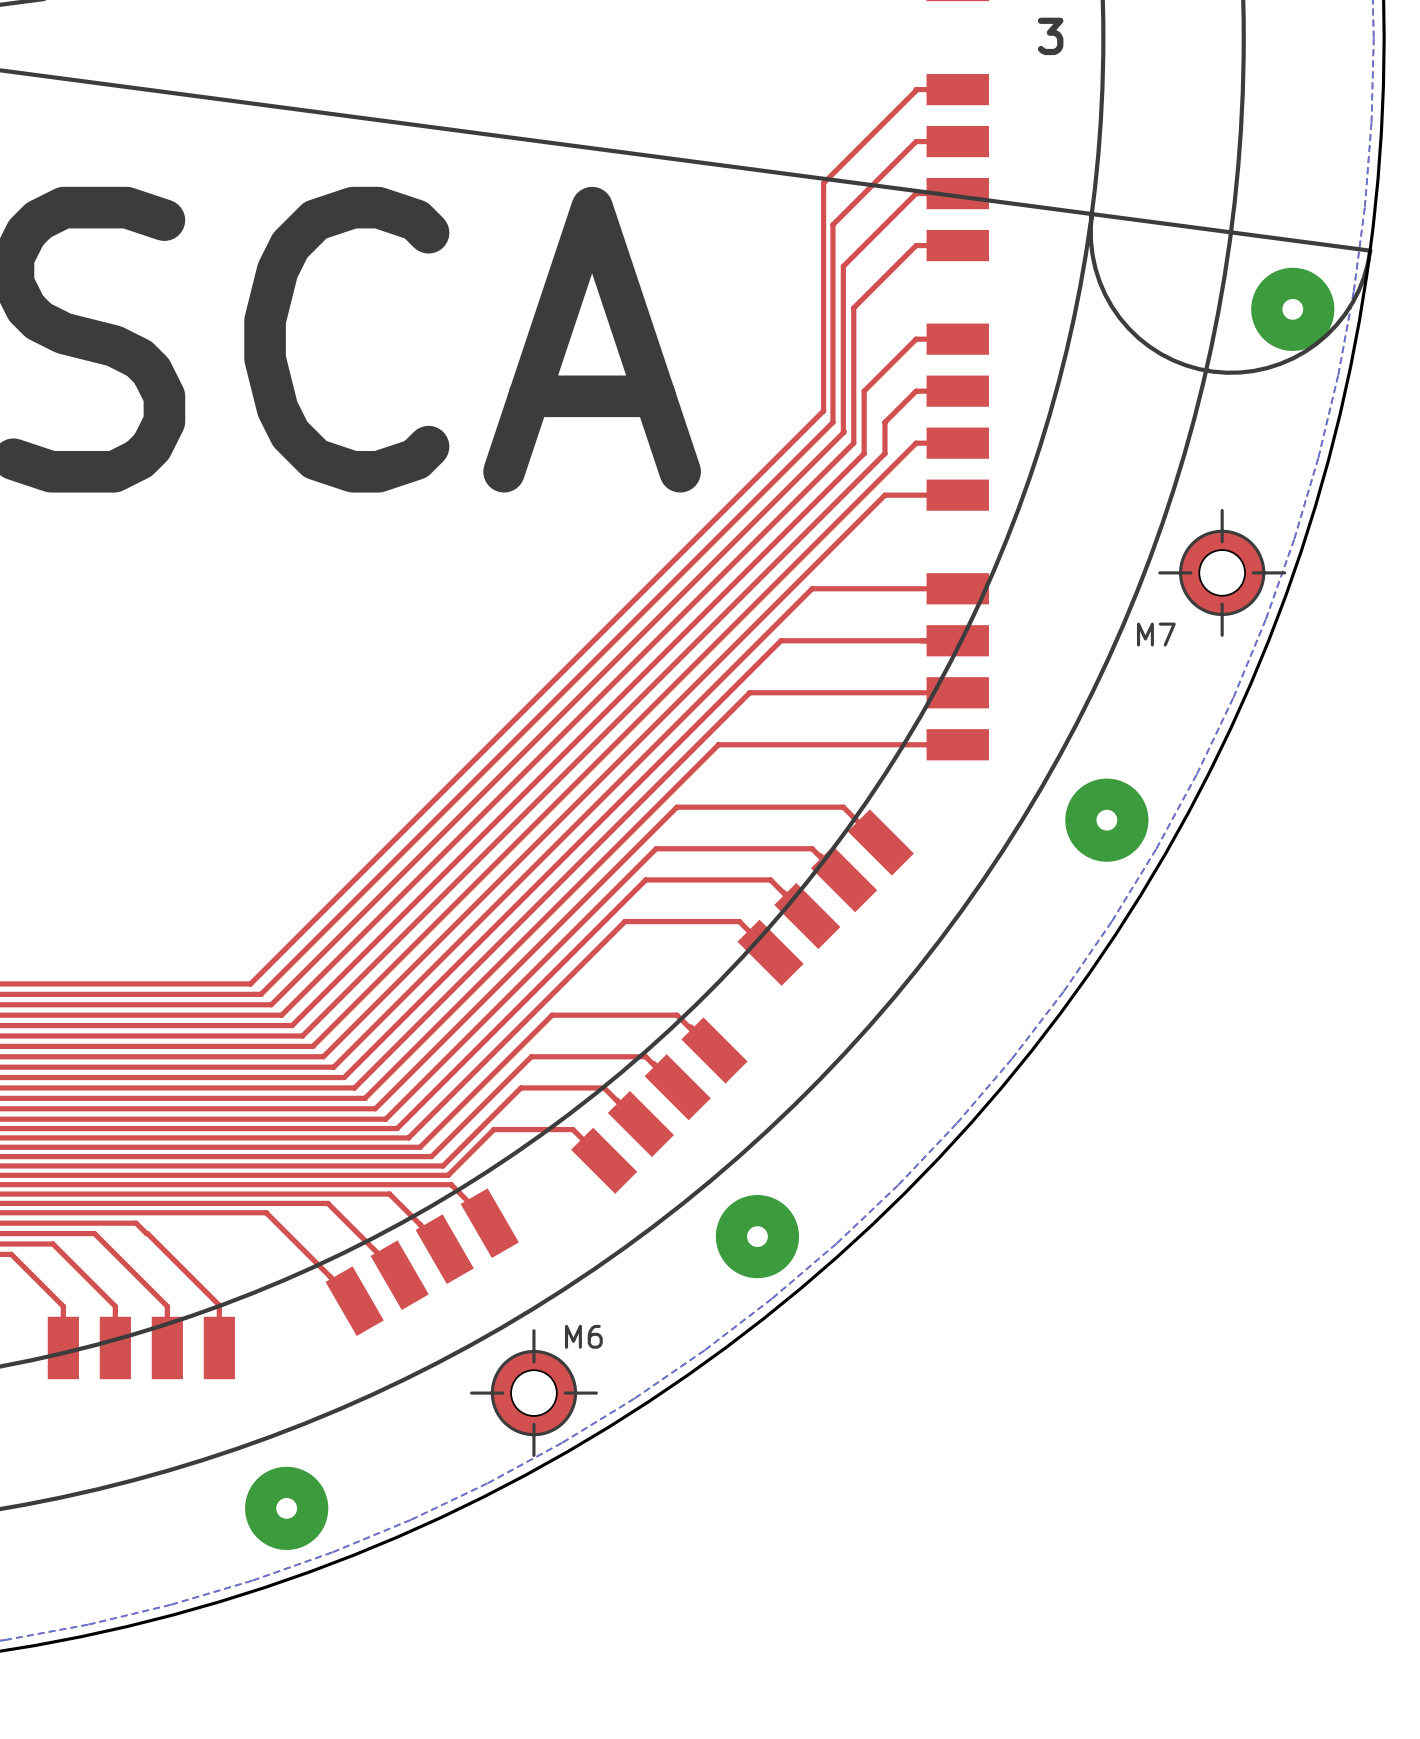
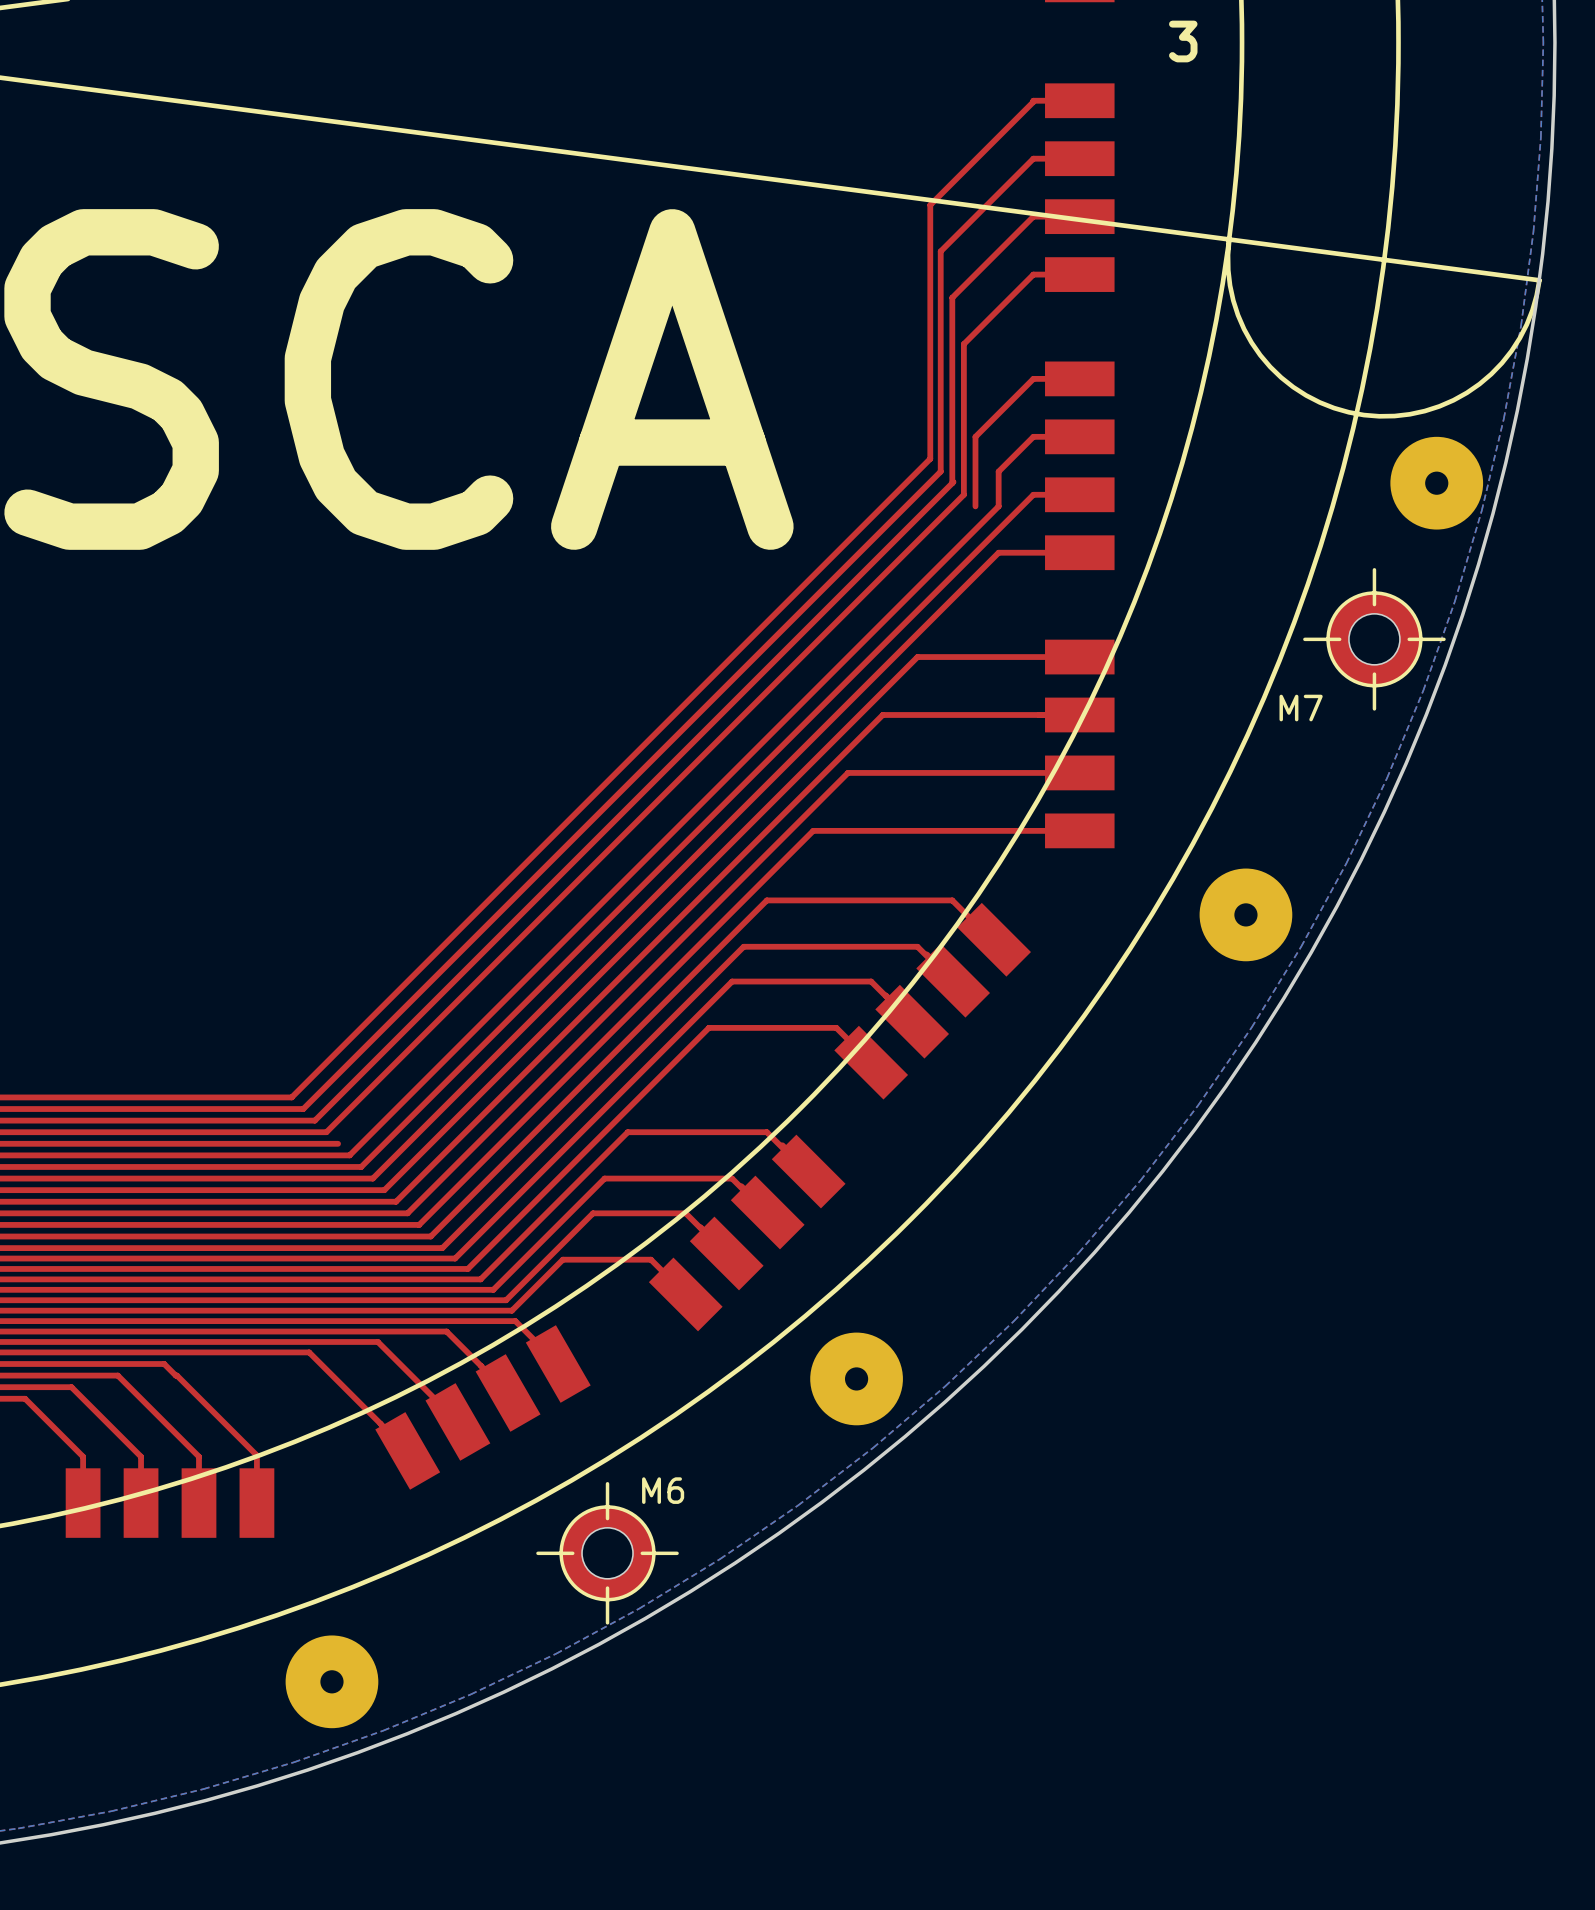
part position: (1292, 309) -> (1436, 483)
top track: (864, 453) (292, 1025) -> none

